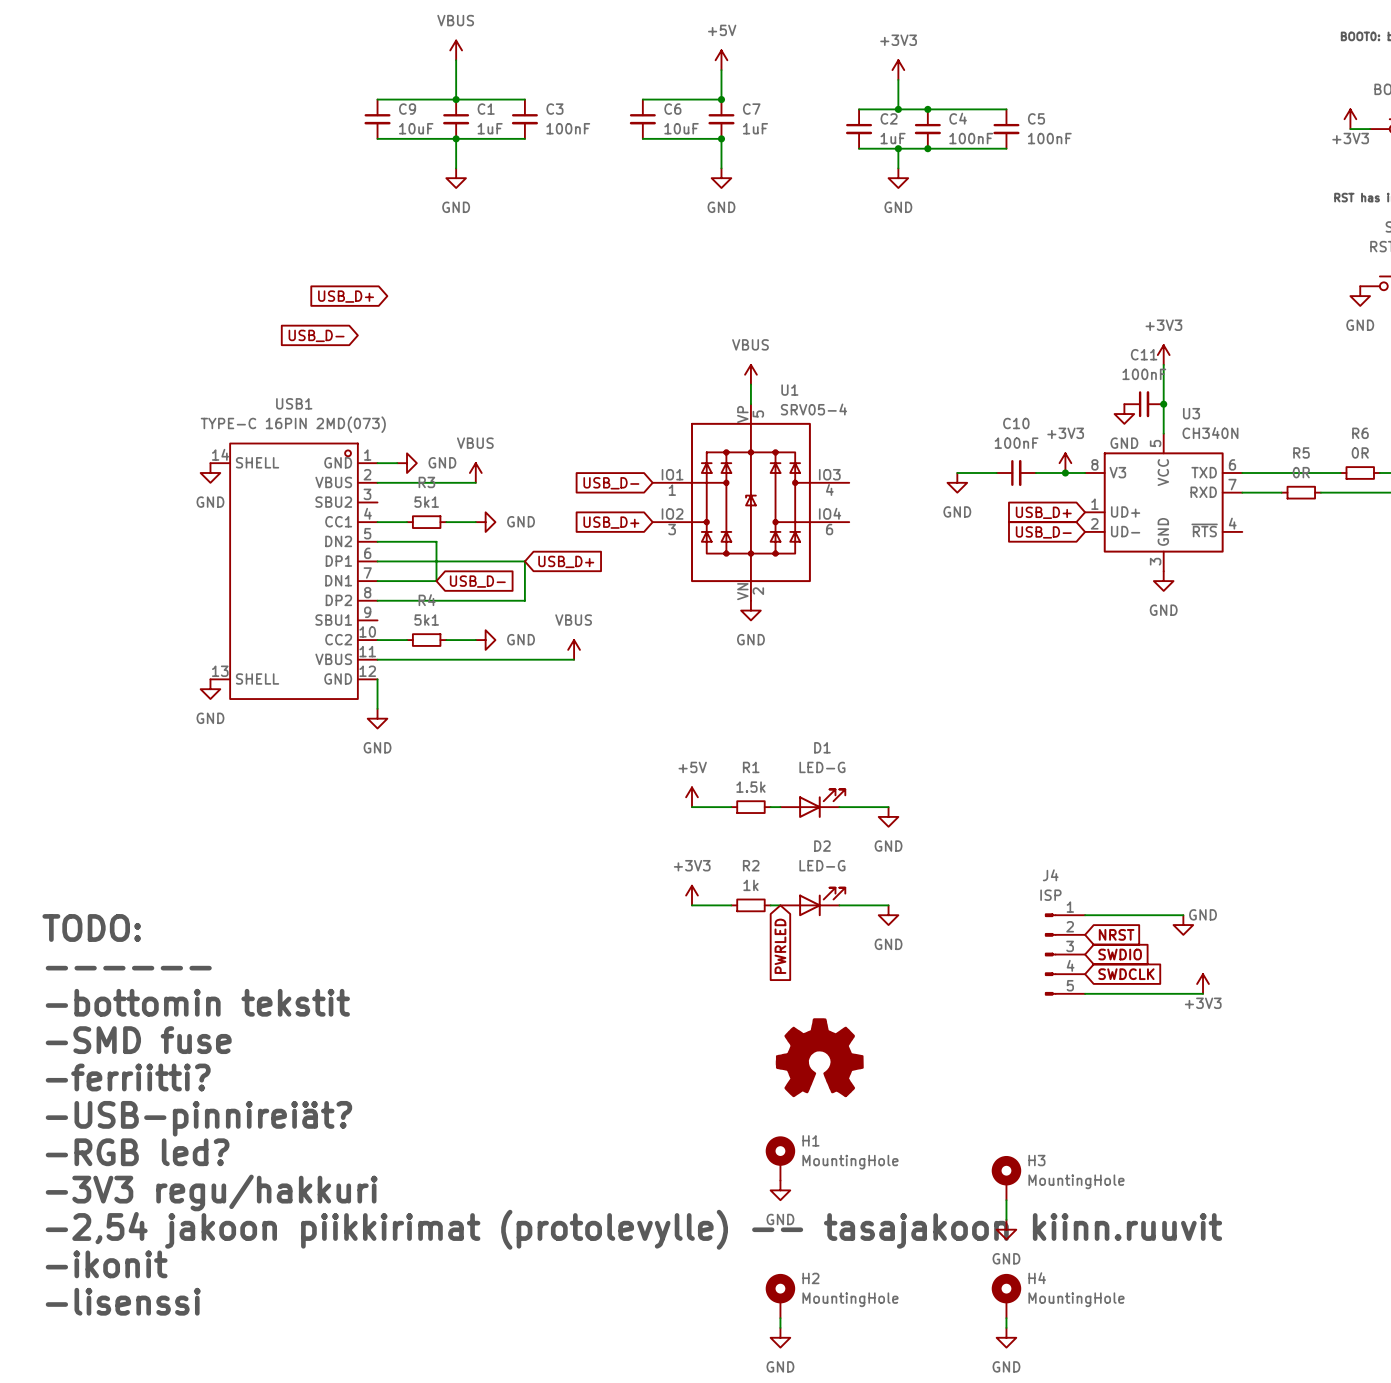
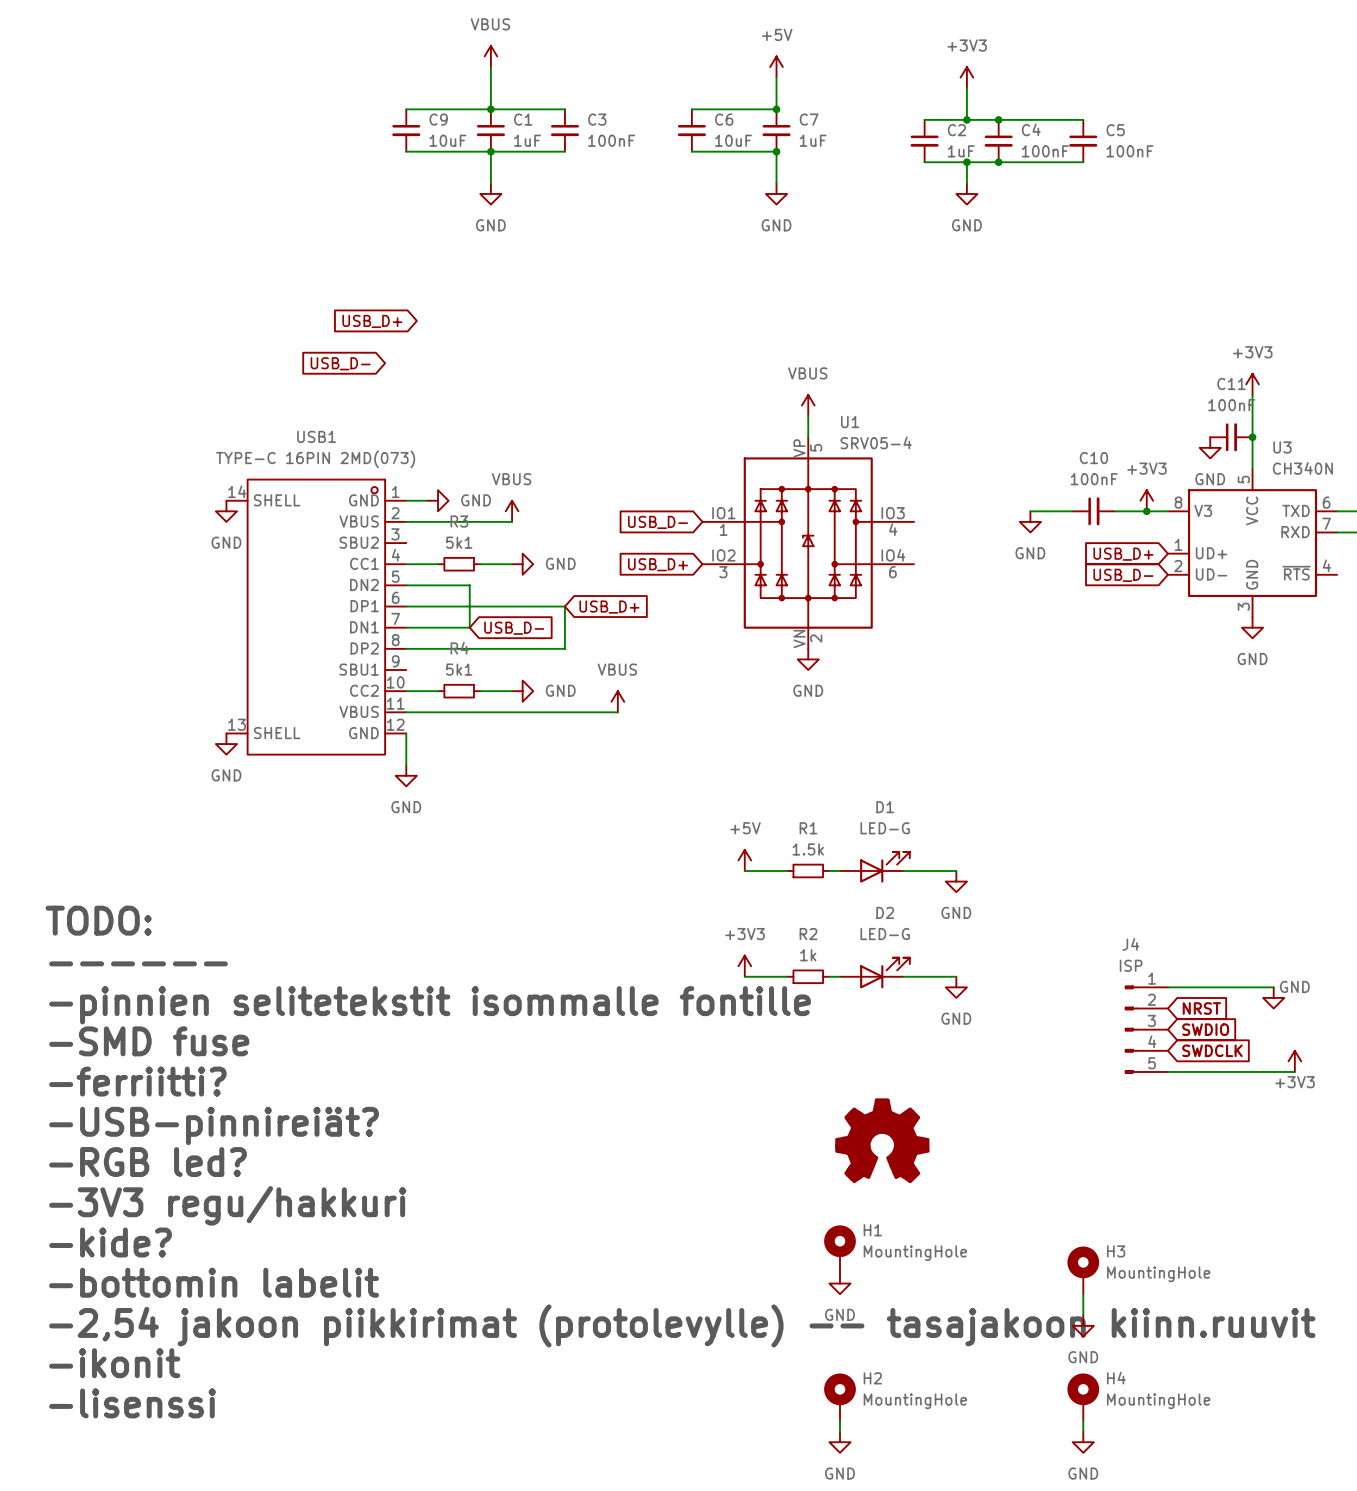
text: none -> TODO: (98, 920)
text: none -> ------ (138, 963)
text: TODO: (91, 928) -> -pinnien selitetekstit isommalle fontille (430, 1005)
global label: PWRLED (780, 946) -> none
text: ------ (128, 968) -> -SMD fuse (149, 1041)
text: -bottomin tekstit (197, 1002) -> -ferriitti? (137, 1081)
text: -SMD fuse (138, 1040) -> -USB-pinnireiät? (214, 1125)
text: -ferriitti? (128, 1077) -> -RGB led? (148, 1162)
text: -USB-pinnireiät? (198, 1118) -> -3V3 regu/hakkuri (227, 1205)
text: -RGB led? (137, 1152) -> -kide? (110, 1242)
text: -3V3 regu/hakkuri (211, 1192) -> -bottomin labelit (214, 1282)

